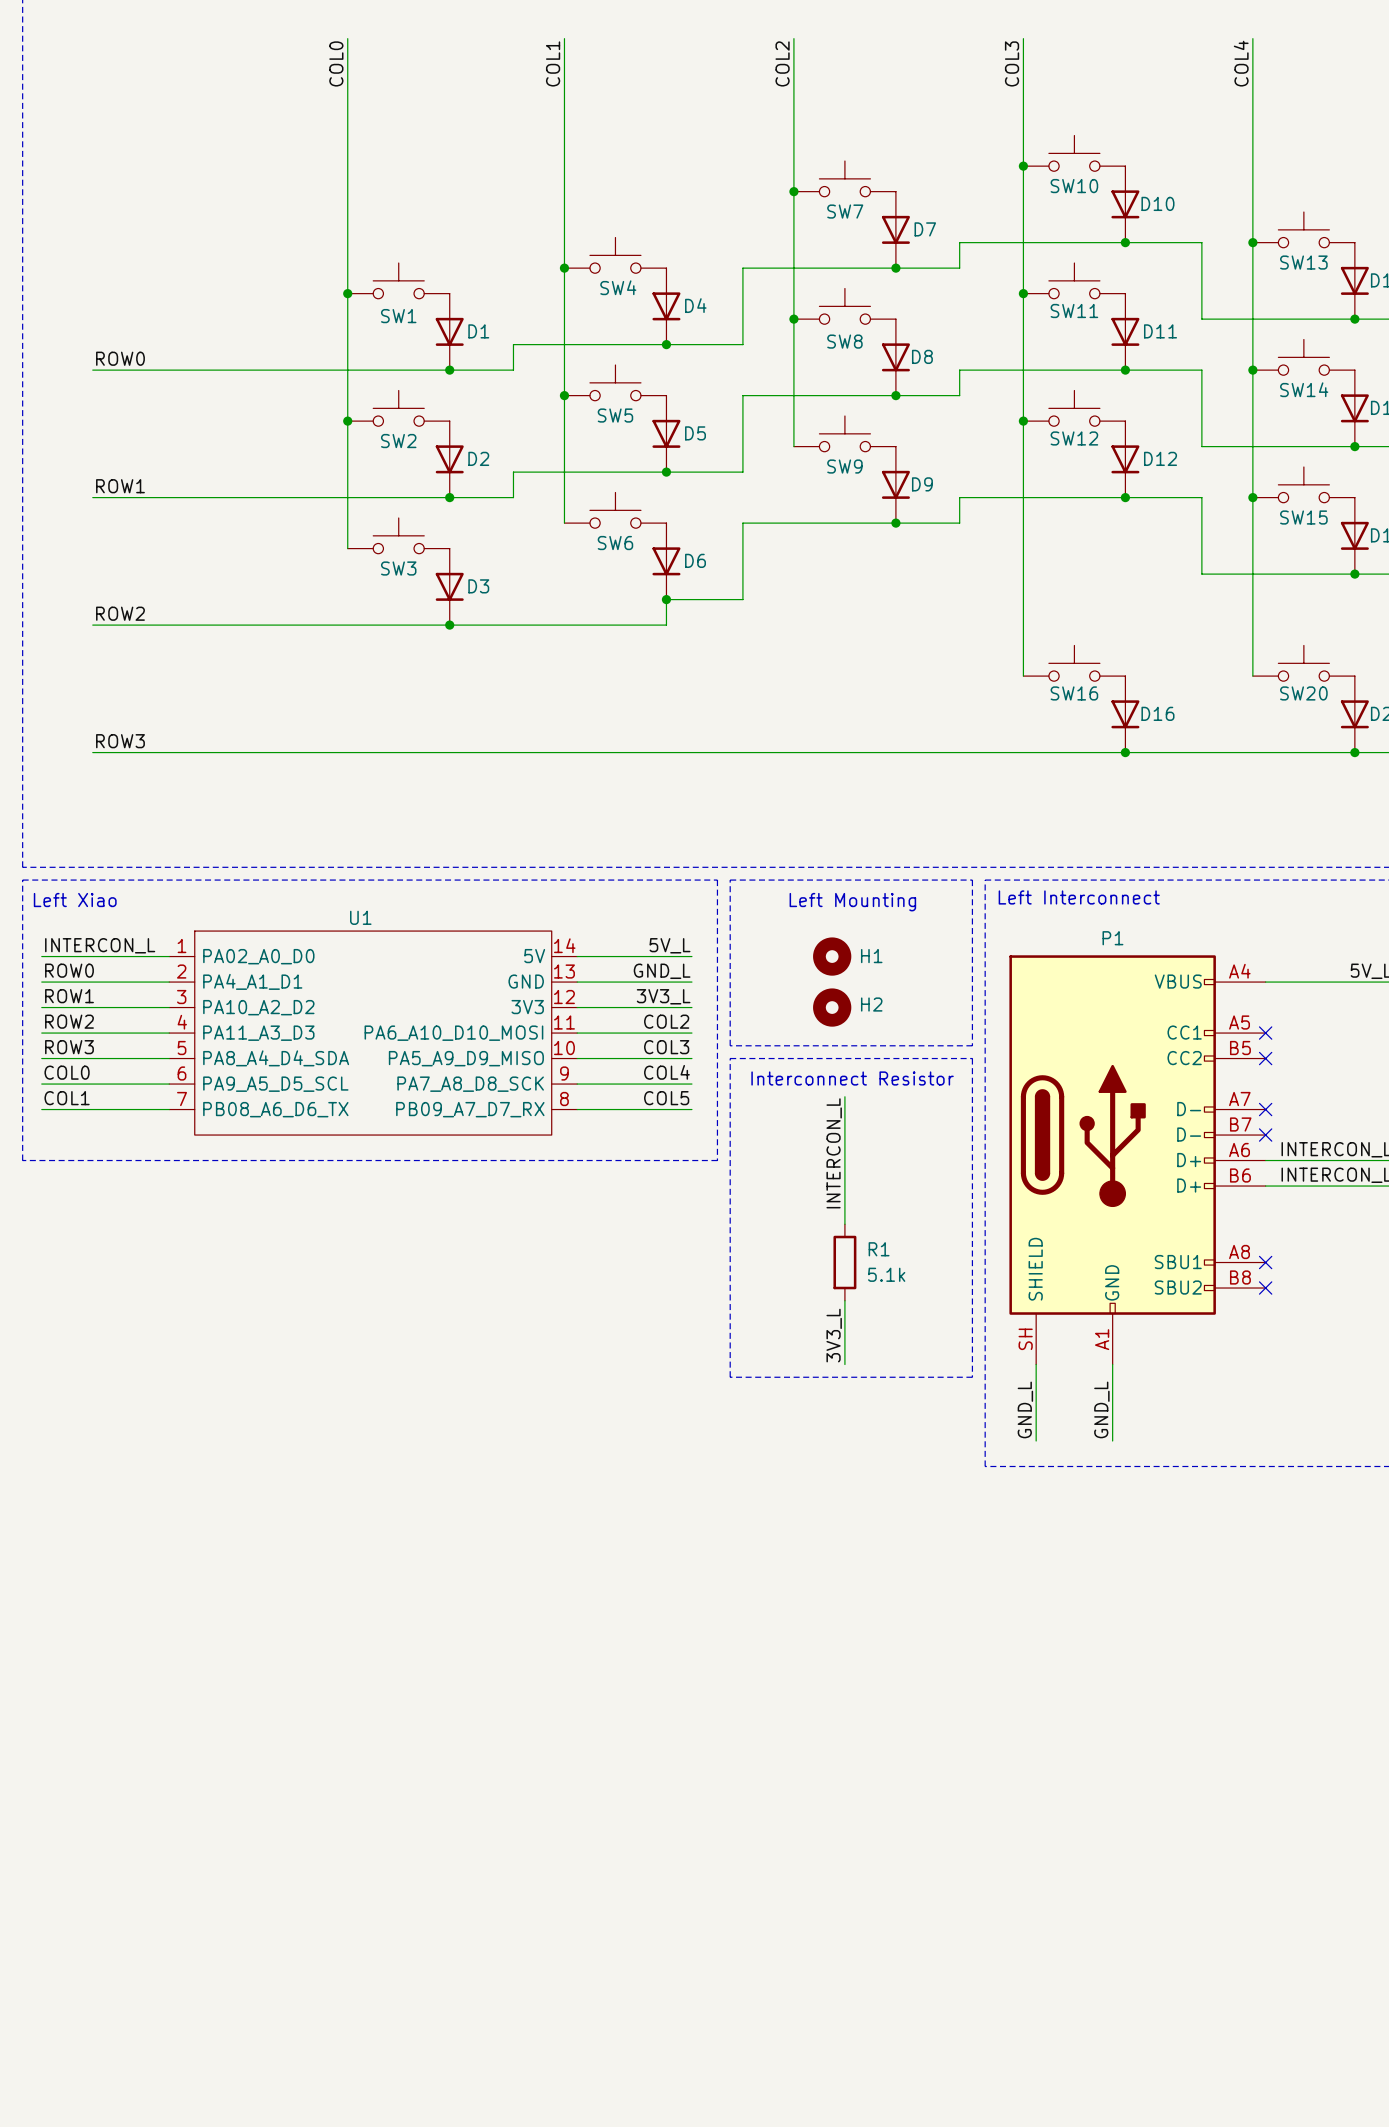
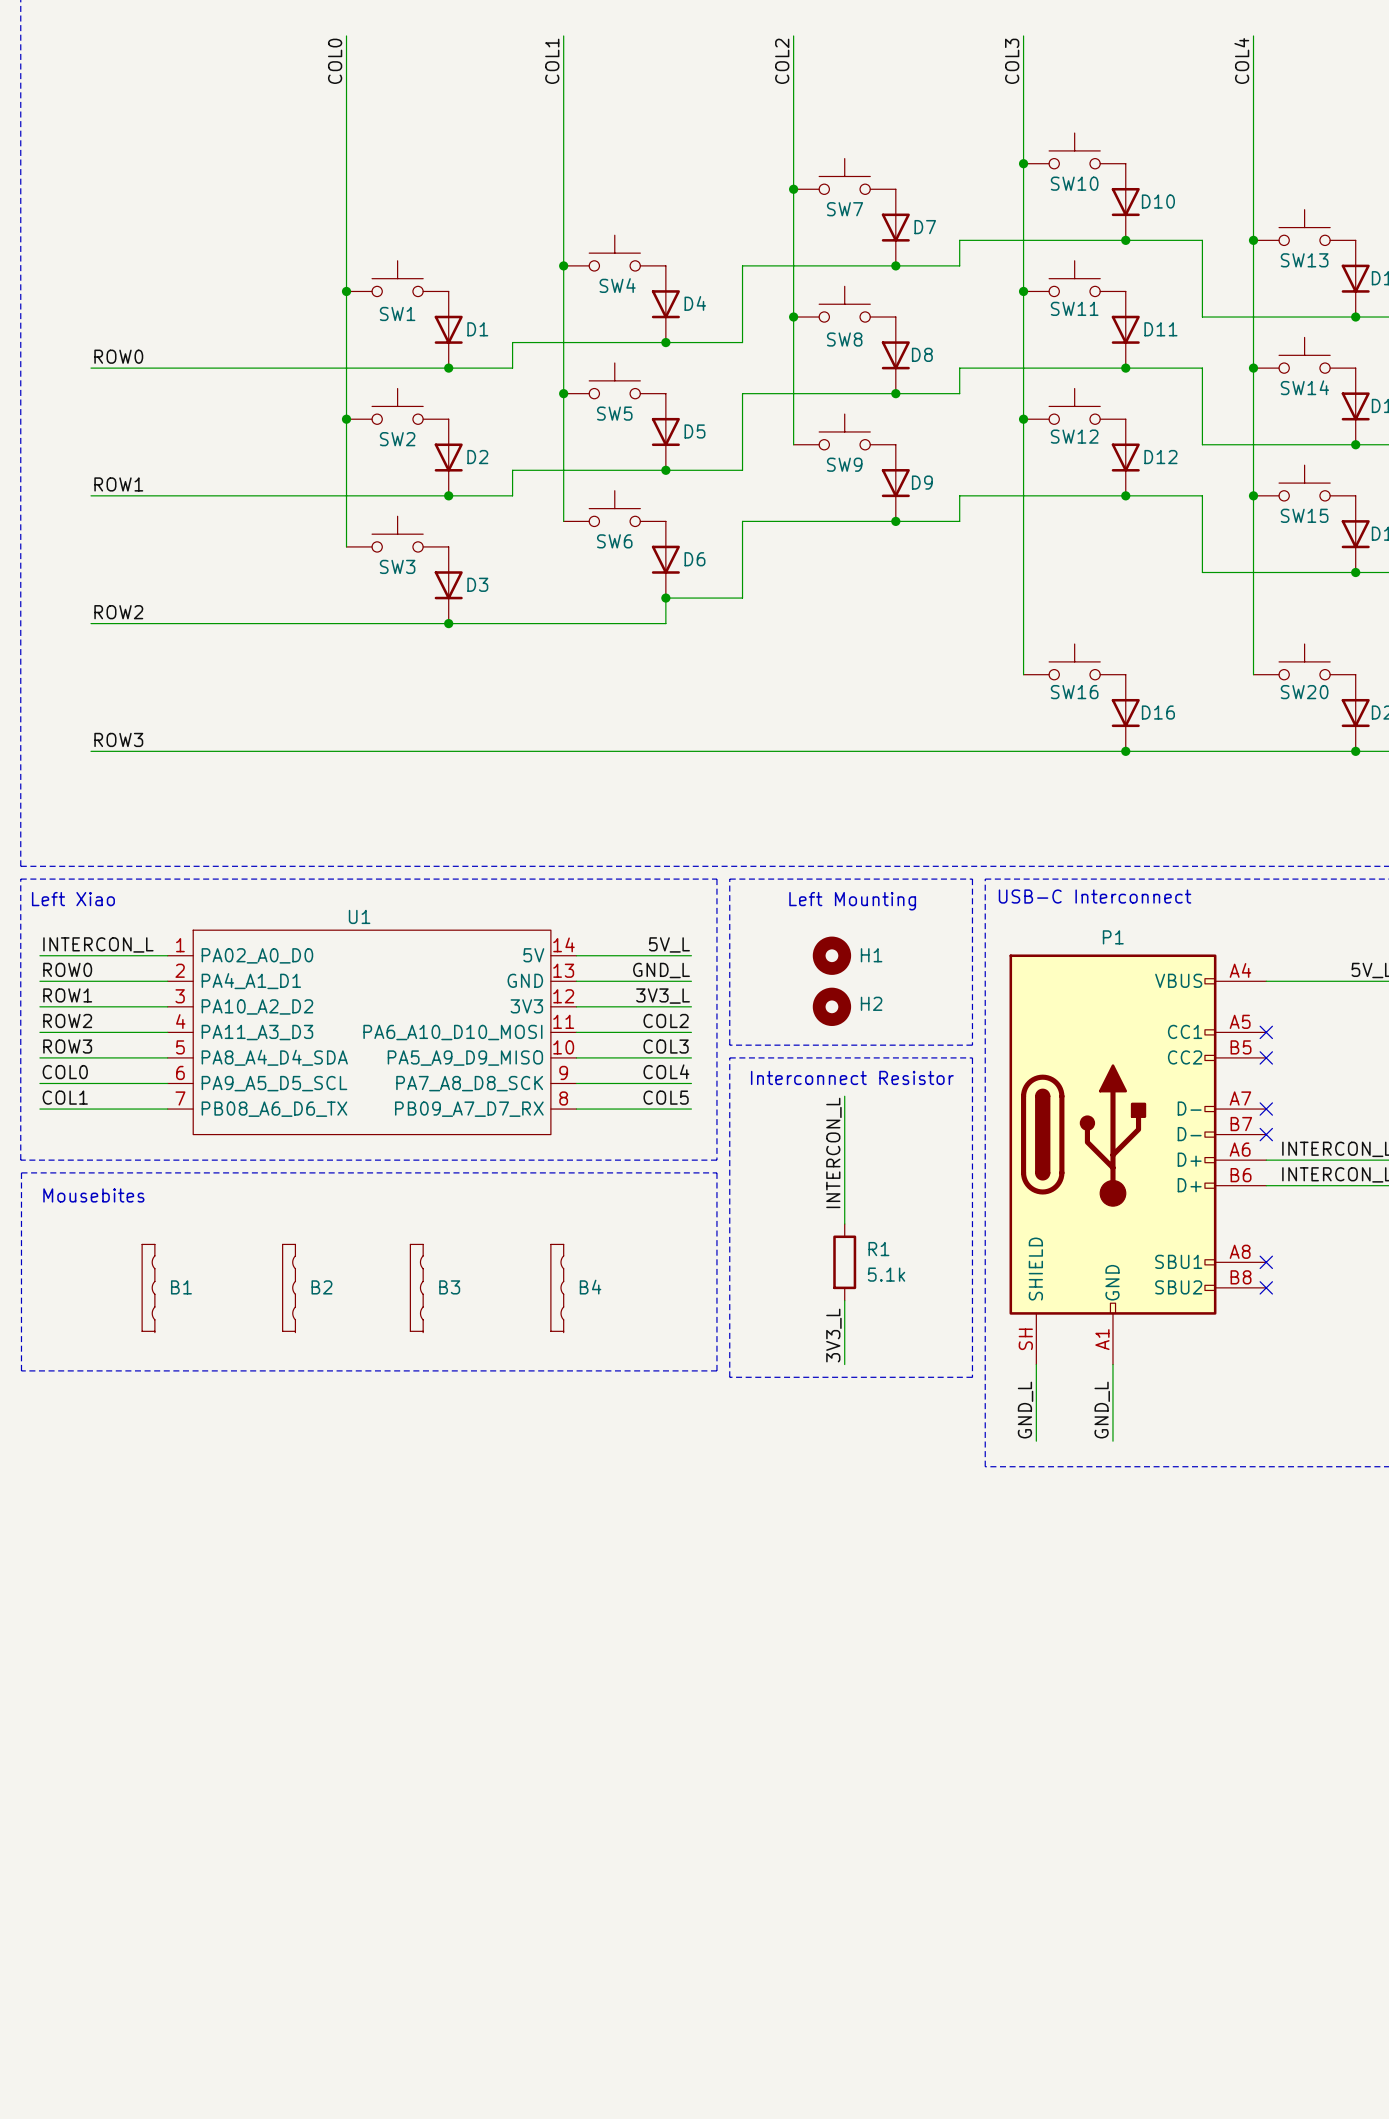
text: Left Interconnect (1079, 897) -> USB-C Interconnect (1095, 896)
line: none -> (21, 1172) (716, 1172) (716, 1370) (21, 1370) (21, 1172)
text: none -> Mousebites (93, 1195)
B1: none -> (148, 1288)
B2: none -> (289, 1288)
B3: none -> (416, 1288)
B4: none -> (557, 1288)

